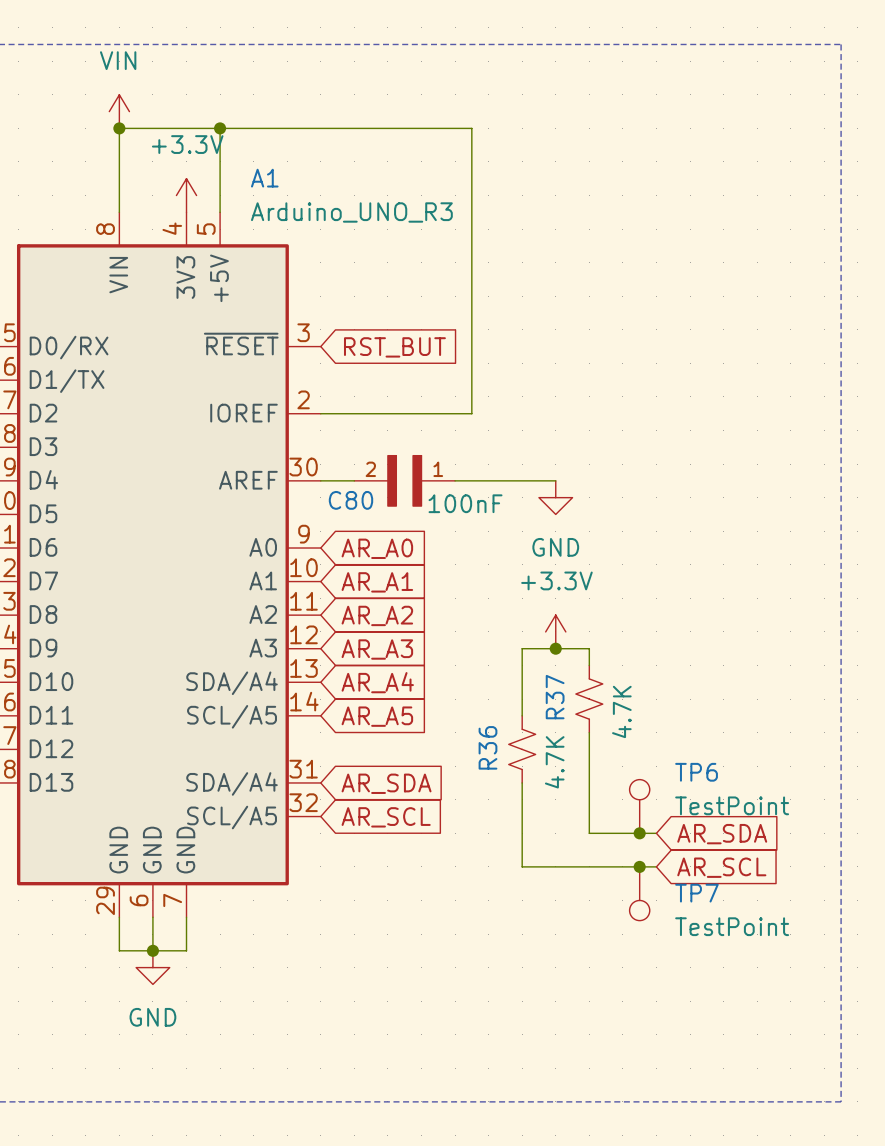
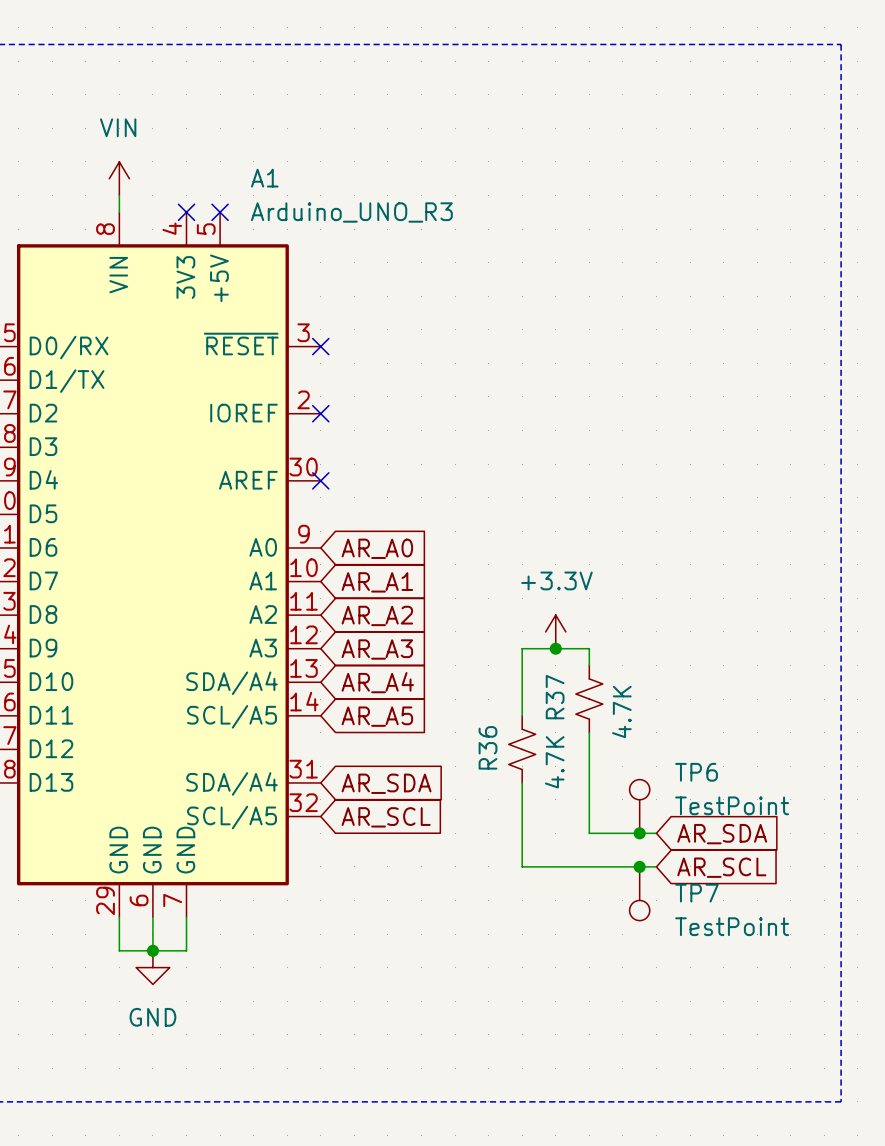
power symbol position: VIN (119, 111) -> VIN (119, 178)
junction: (119, 128) -> none
wire: (220, 128) (220, 212) -> none
junction: (220, 128) -> none
wire: (119, 195) (119, 128) (471, 128) (471, 413) (320, 413) -> none
power symbol: +3.3V (186, 195) -> none
no-connect mark: none -> (186, 212)
no-connect mark: none -> (220, 212)
no-connect mark: none -> (320, 346)
global label: RST_BUT (394, 347) -> none
no-connect mark: none -> (320, 413)
wire: (320, 480) (354, 480) -> none
no-connect mark: none -> (320, 480)
C80: 100nF (404, 480) -> none
wire: (455, 480) (555, 480) -> none
power symbol: GND (555, 497) -> none

